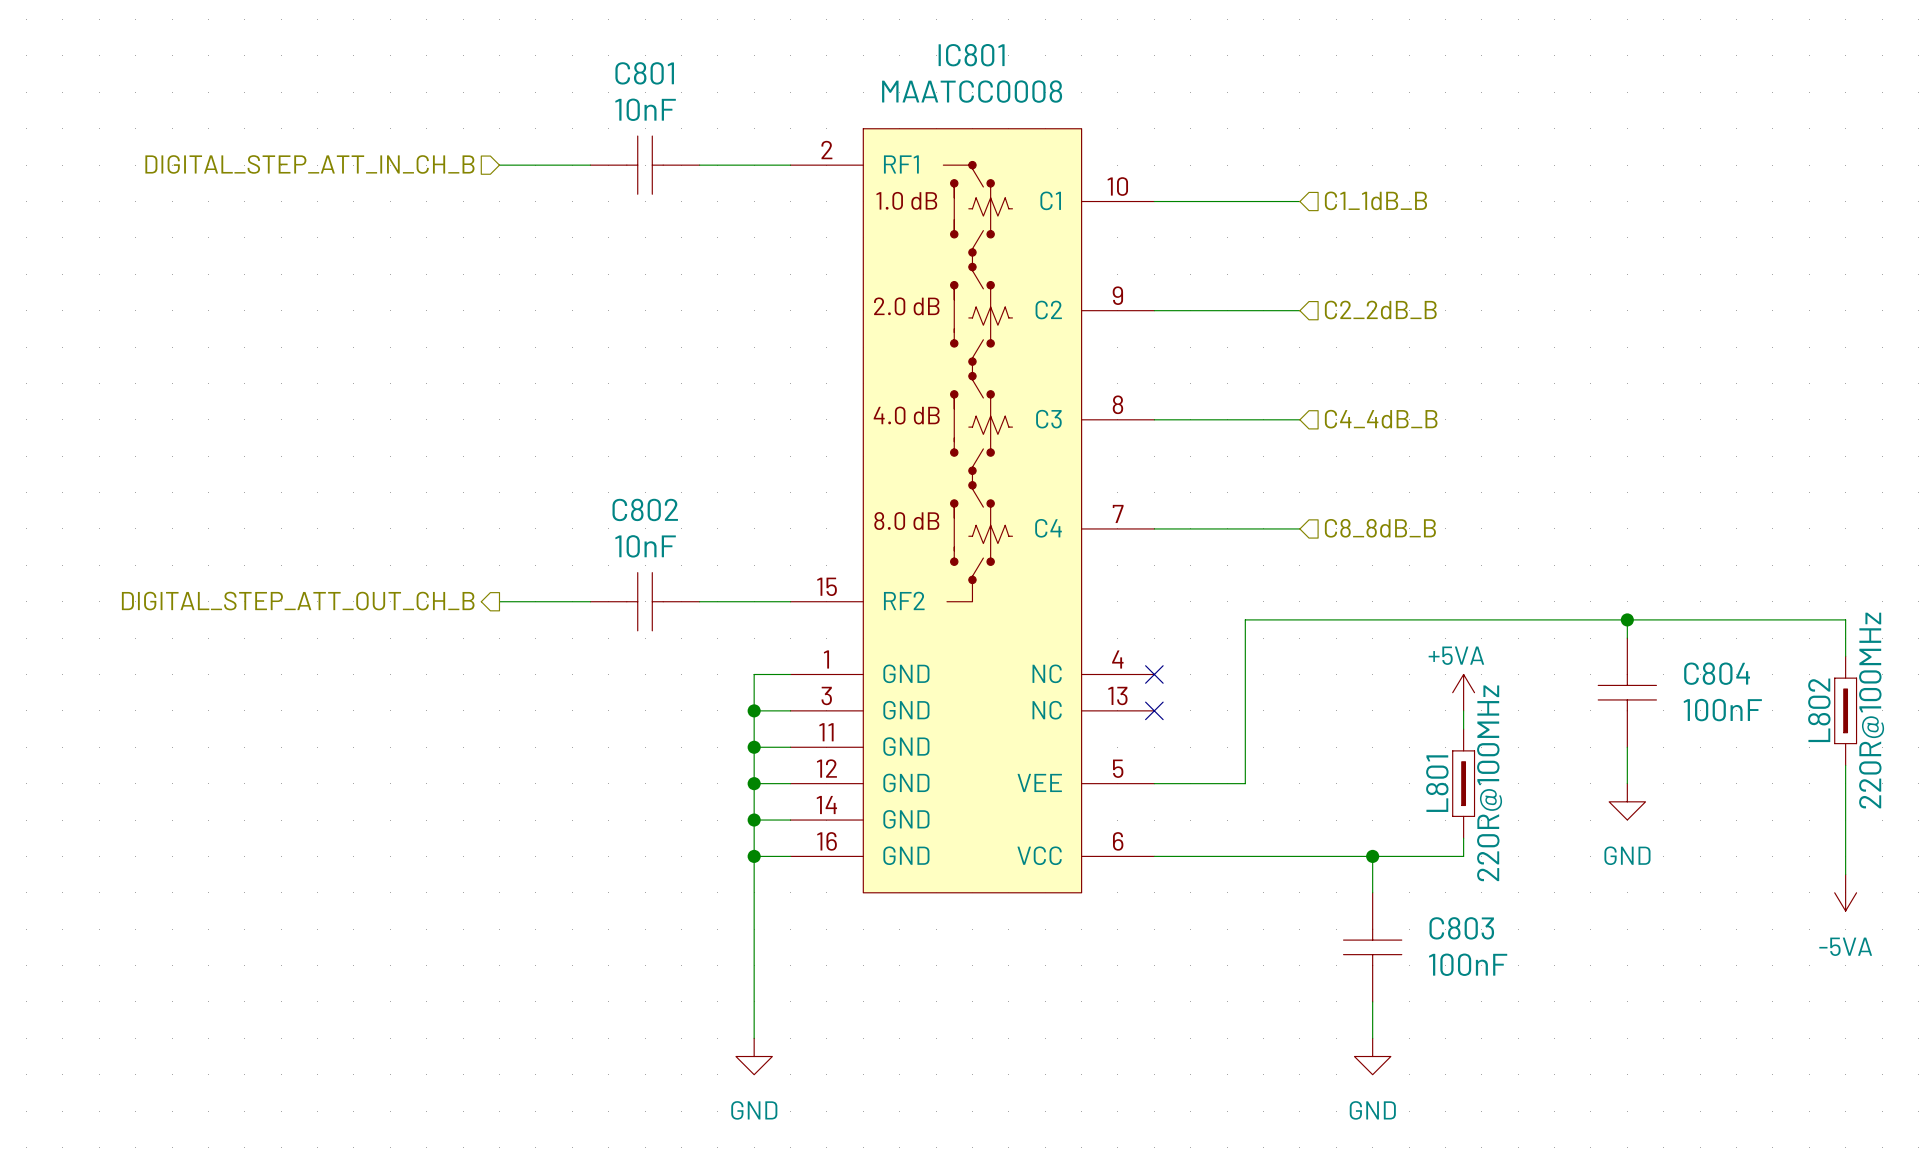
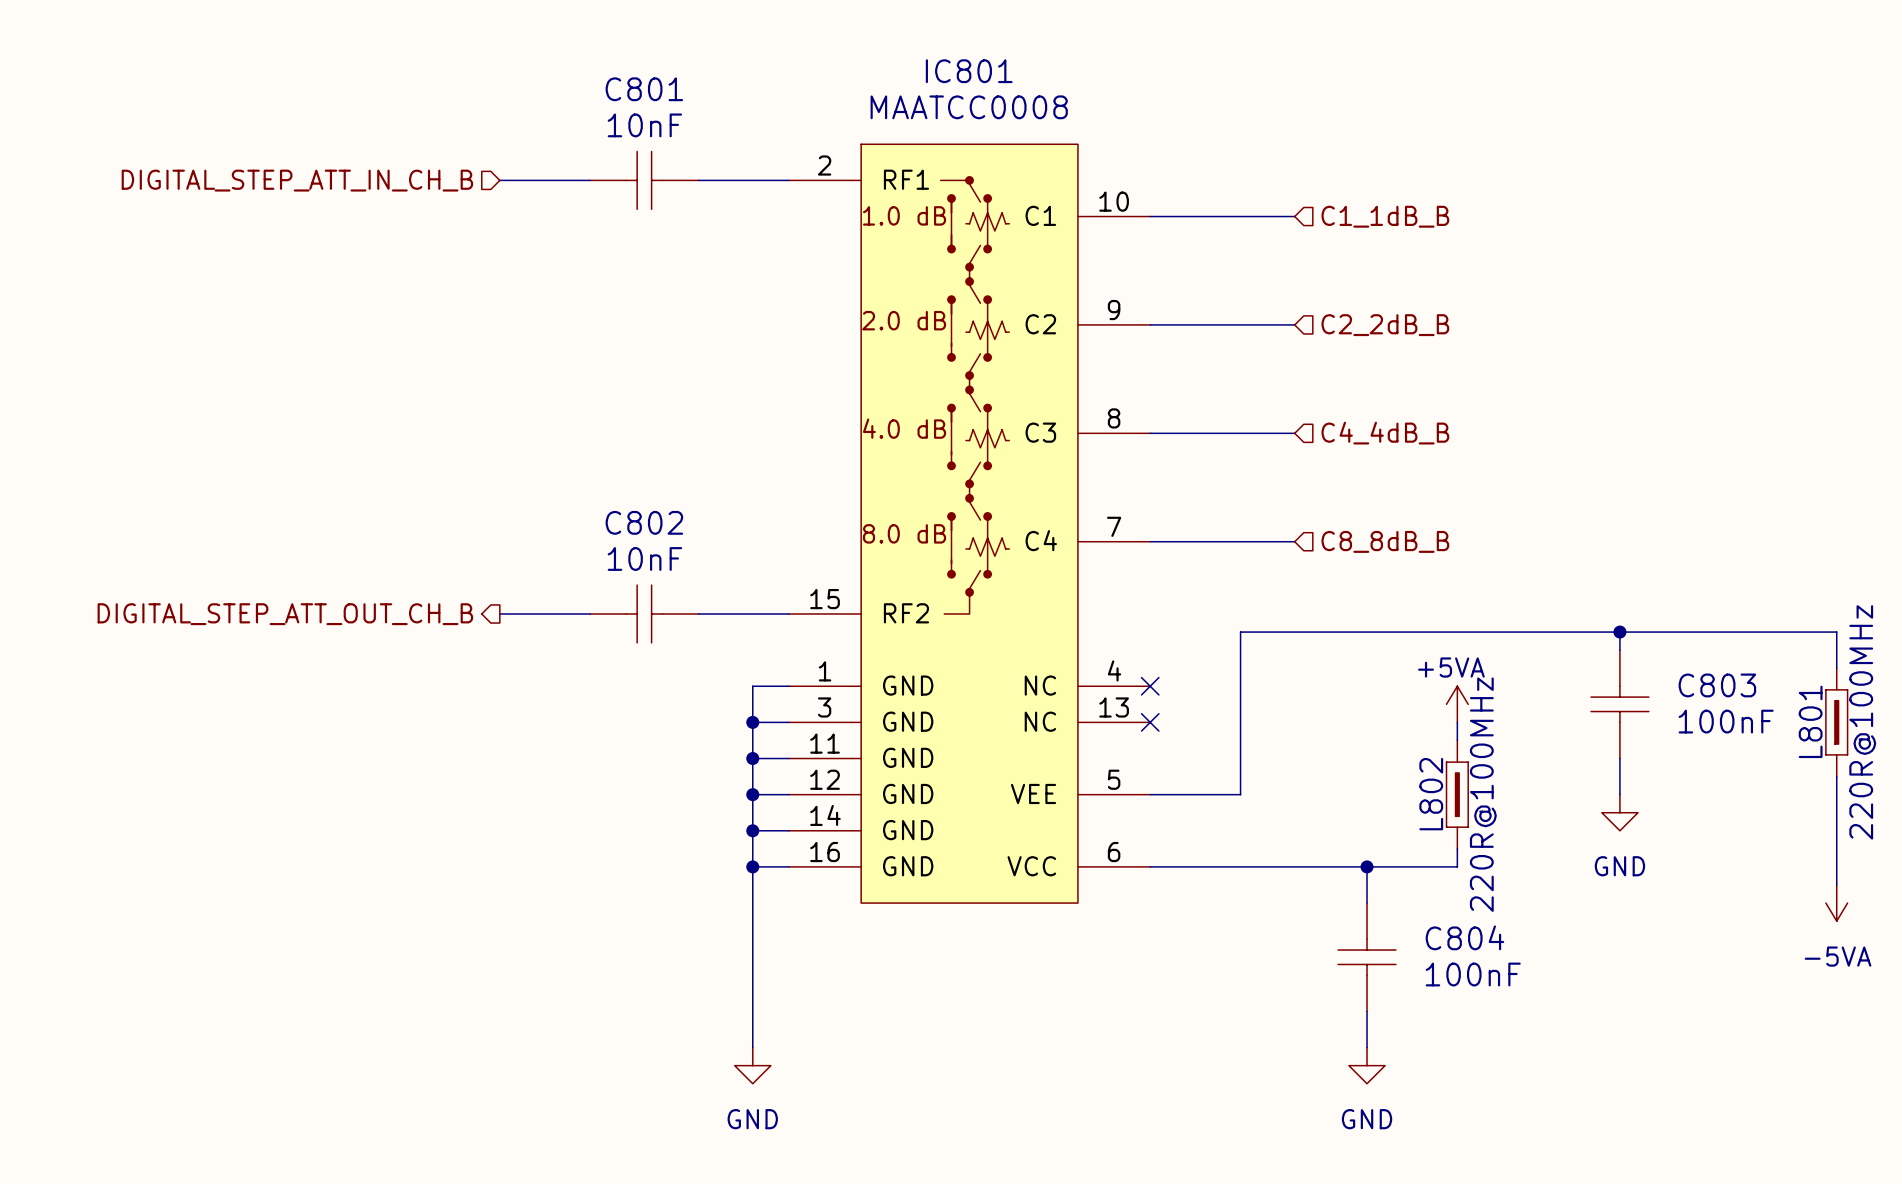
C804 name: C804 (1717, 673) -> C803 (1717, 685)
L802 name: L802 (1819, 710) -> L801 (1810, 721)
L801 name: L801 (1437, 783) -> L802 (1431, 794)
C803 name: C803 (1461, 928) -> C804 (1464, 937)

